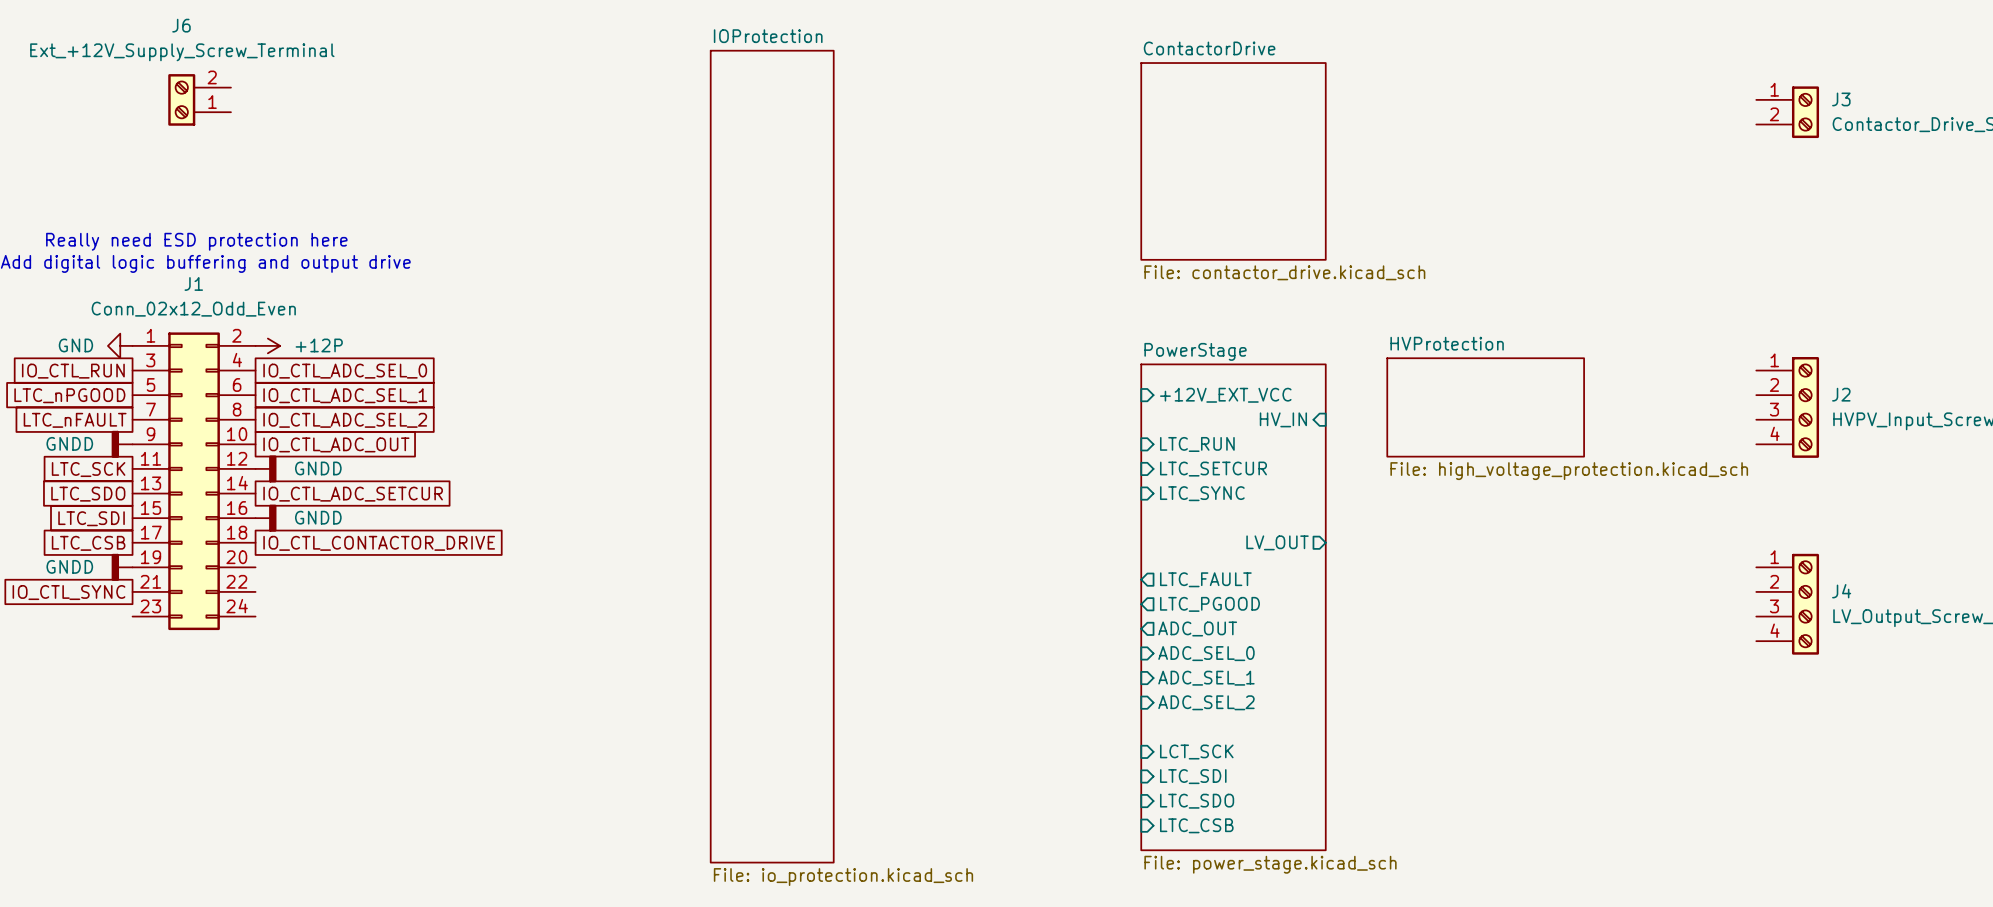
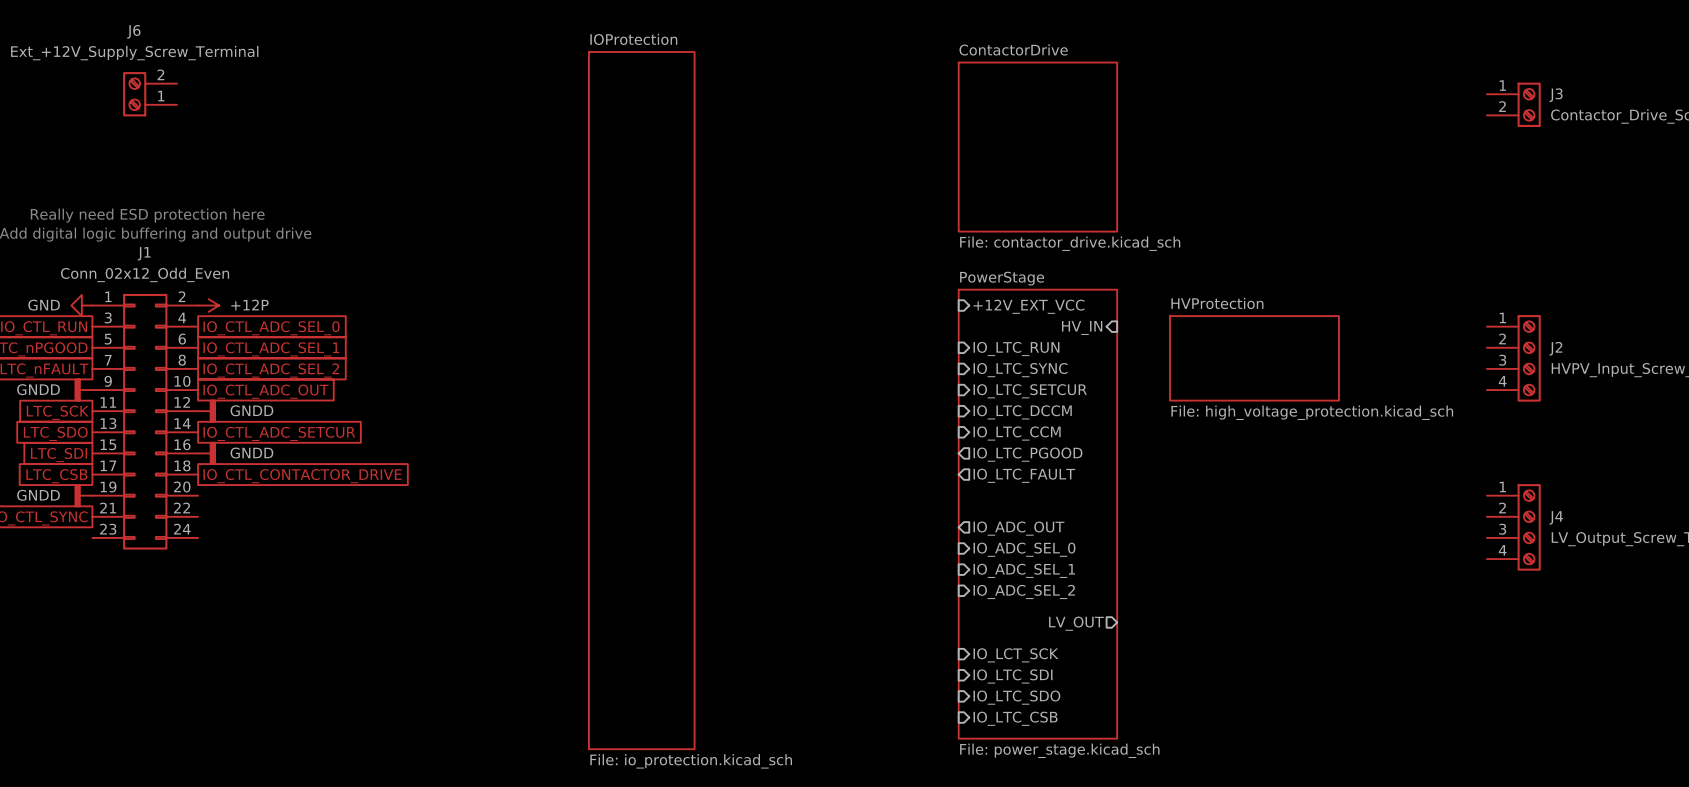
sheet pin: none -> +12V_EXT_VCC (1029, 306)
sheet pin: +12V_EXT_VCC (1225, 395) -> IO_LTC_RUN (1016, 349)
sheet pin: none -> IO_LTC_SYNC (1020, 370)
sheet pin position: HV_IN (1283, 419) -> HV_IN (1082, 327)
sheet pin: LTC_RUN (1197, 444) -> IO_LTC_SETCUR (1030, 391)
sheet pin: LTC_SETCUR (1213, 469) -> IO_LTC_DCCM (1022, 412)
sheet pin: LTC_SYNC (1202, 493) -> IO_LTC_CCM (1017, 433)
sheet pin: none -> IO_LTC_PGOOD (1027, 454)
sheet pin: none -> IO_LTC_FAULT (1024, 475)
sheet pin position: LV_OUT (1277, 542) -> LV_OUT (1076, 623)
sheet pin: LTC_FAULT (1205, 579) -> none
sheet PowerStage: none -> File: power_stage.kicad_sch (1037, 514)
sheet pin: LTC_PGOOD (1209, 604) -> IO_ADC_OUT (1018, 528)
sheet PowerStage: File: power_stage.kicad_sch (1233, 607) -> none
sheet pin shape: output (1197, 628) -> input (1024, 549)
sheet pin: ADC_OUT (1197, 628) -> IO_ADC_SEL_0 (1024, 549)
sheet pin: ADC_SEL_0 (1206, 653) -> IO_ADC_SEL_1 (1024, 570)
sheet pin: ADC_SEL_1 (1206, 678) -> IO_ADC_SEL_2 (1024, 591)
sheet pin: ADC_SEL_2 (1206, 702) -> none
sheet pin: LCT_SCK (1196, 751) -> IO_LCT_SCK (1015, 655)
sheet pin: LTC_SDI (1193, 776) -> IO_LTC_SDI (1013, 676)
sheet pin: LTC_SDO (1197, 801) -> IO_LTC_SDO (1016, 697)
sheet pin: LTC_CSB (1196, 825) -> IO_LTC_CSB (1015, 718)

